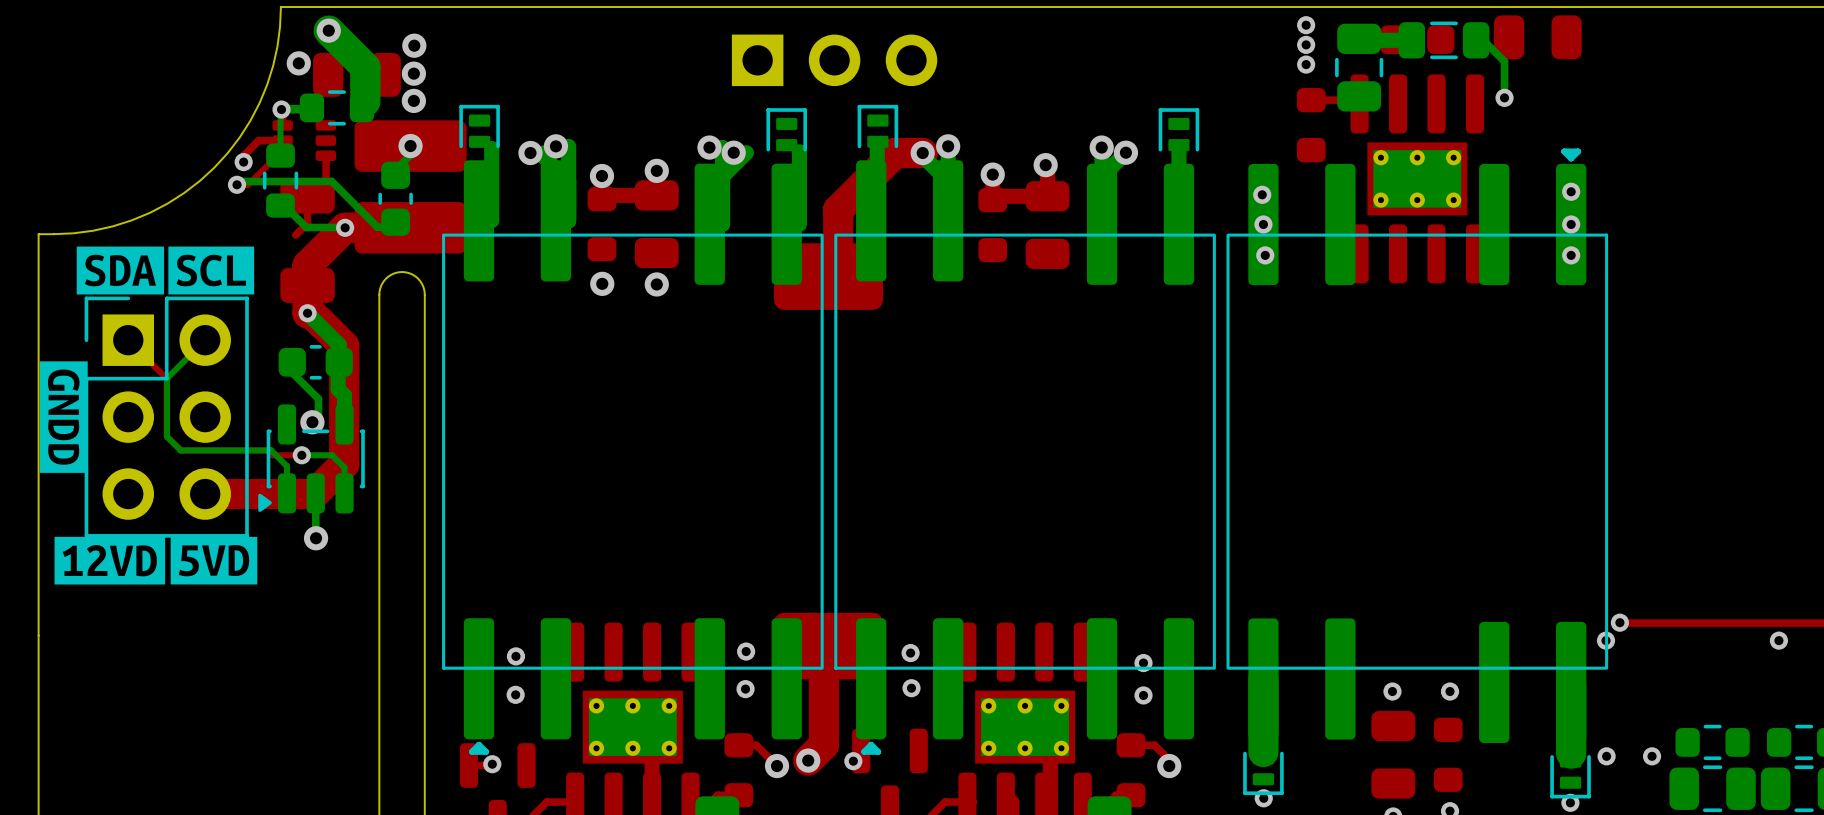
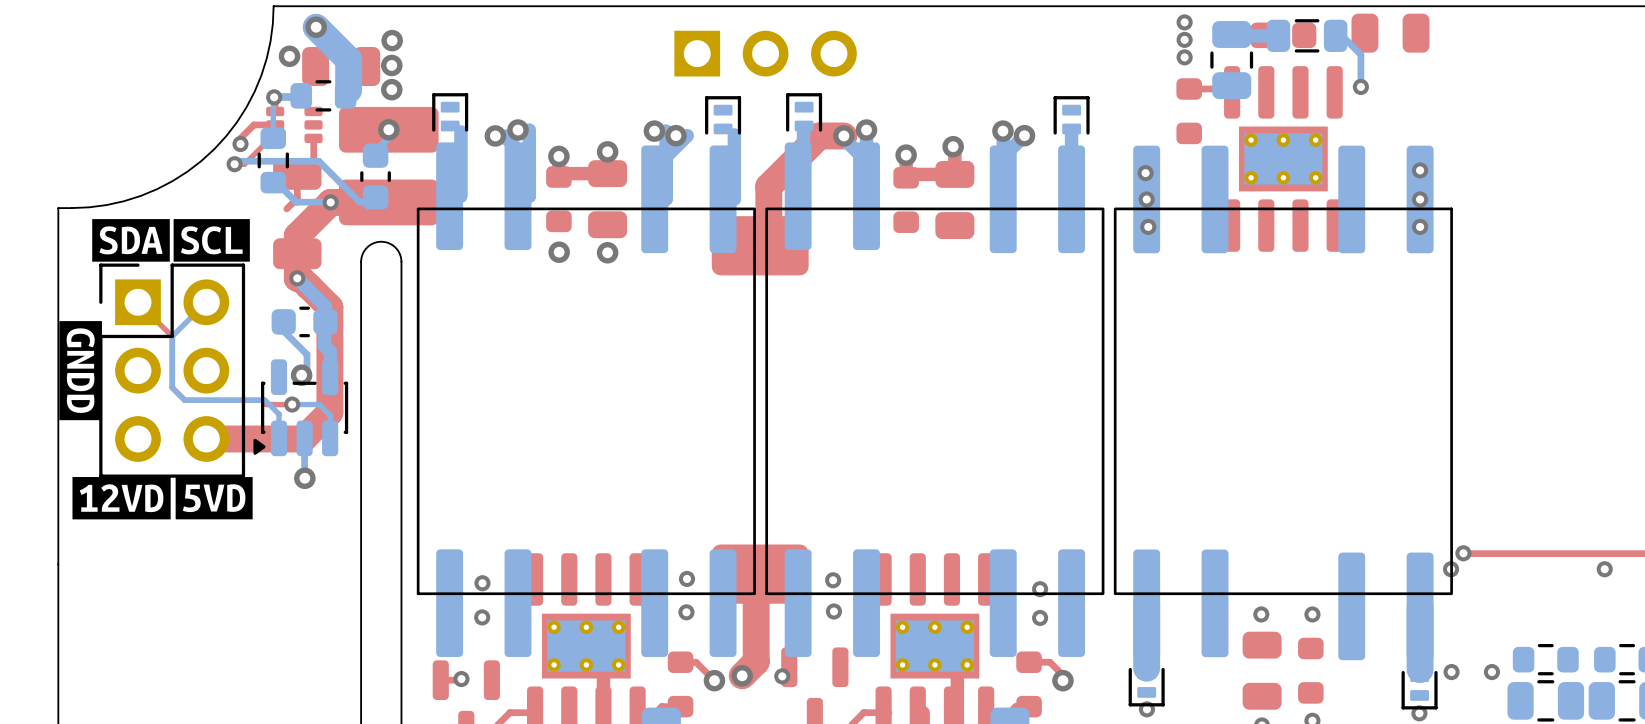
part footprint: [1209, 148, 1625, 744] -> [1099, 145, 1468, 661]
part footprint: [425, 160, 841, 755] -> [402, 142, 771, 657]
part footprint: [817, 160, 1233, 755] -> [750, 142, 1120, 657]

